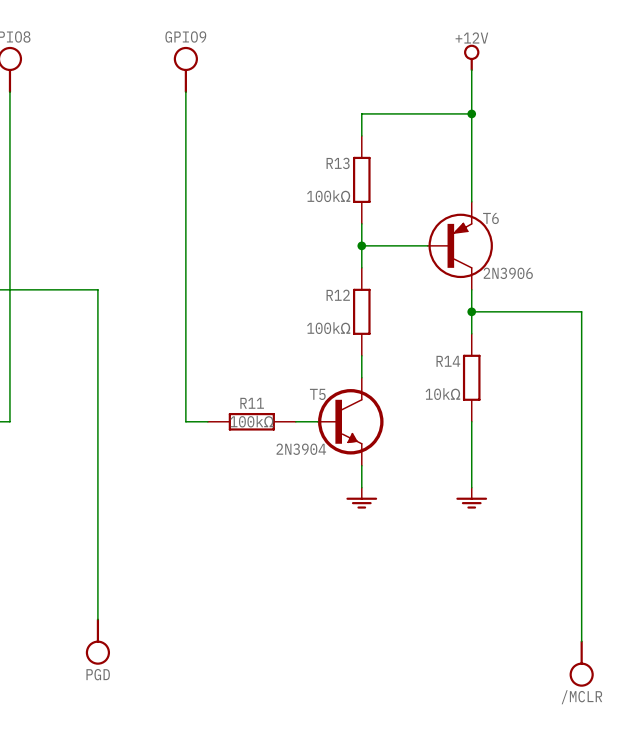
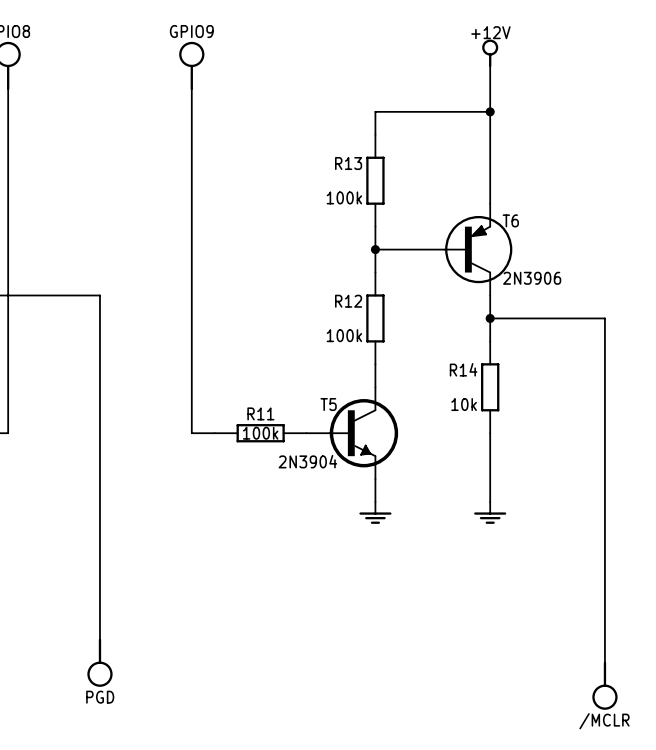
R13 value: 100kΩ (328, 196) -> 100k (344, 197)
R12 value: 100kΩ (328, 328) -> 100k (344, 335)
R14 value: 10kΩ (442, 394) -> 10k (464, 404)
R11 value: 100kΩ (251, 421) -> 100k (260, 433)

